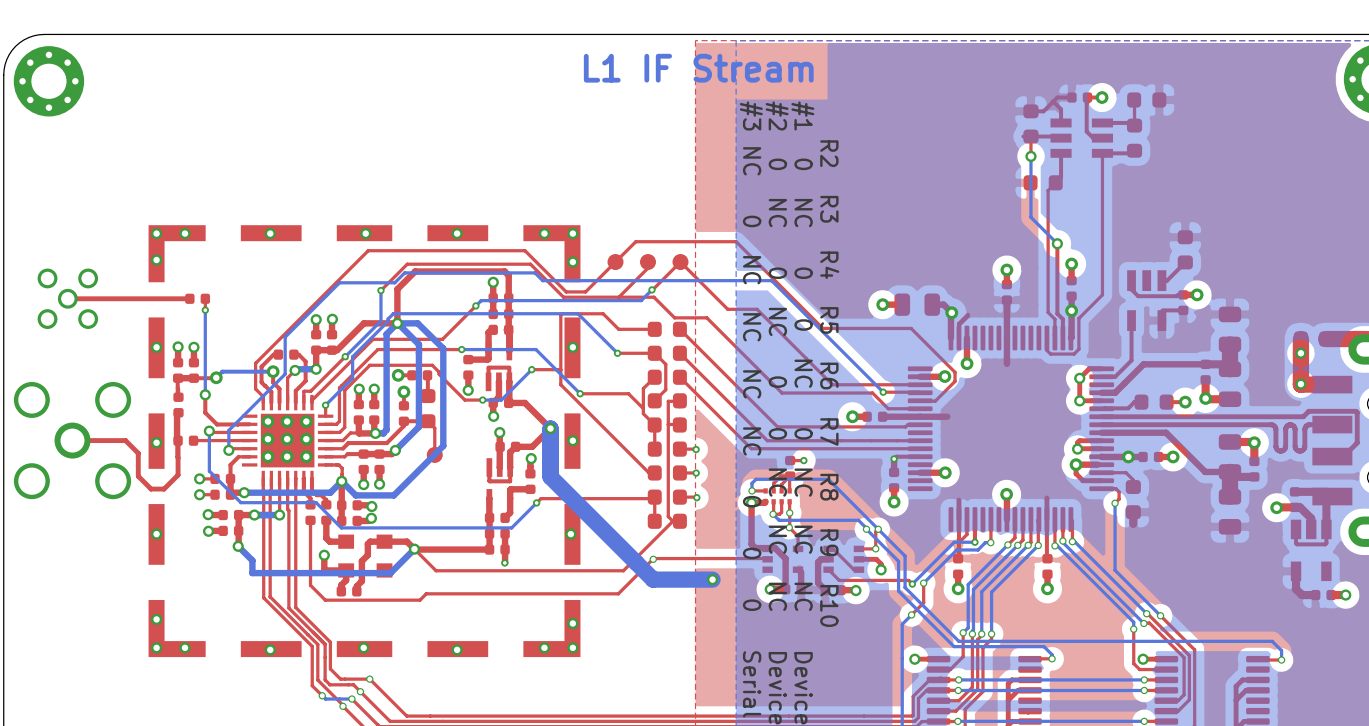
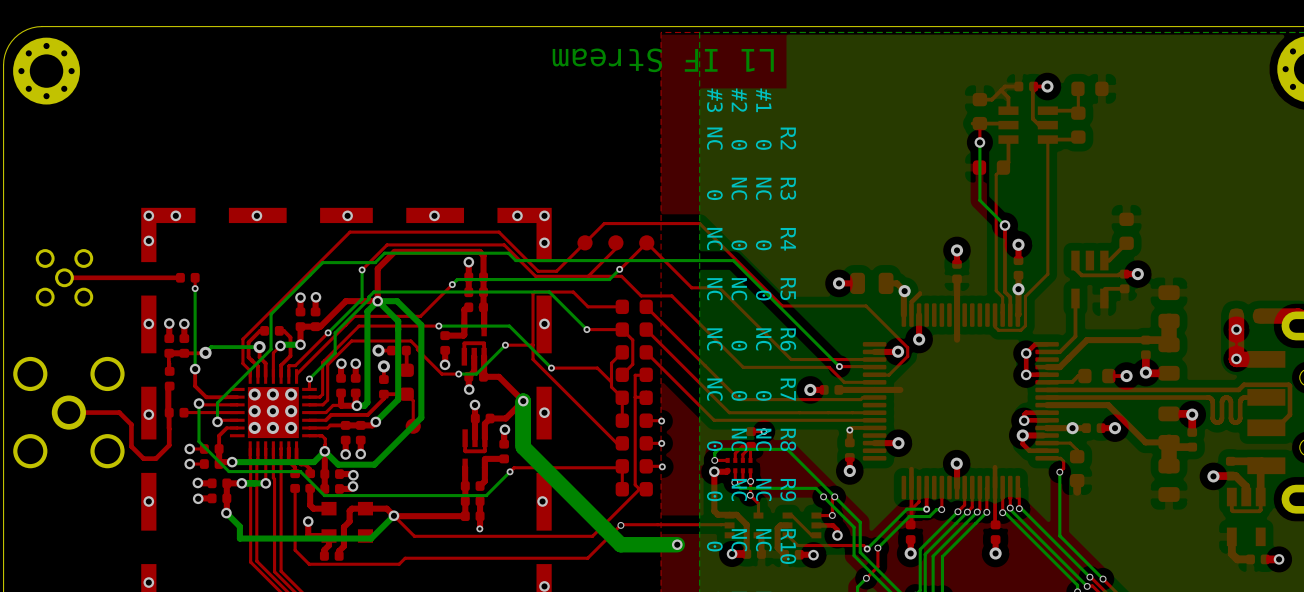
text rotation: 0° (698, 68) -> 180° (663, 60)

